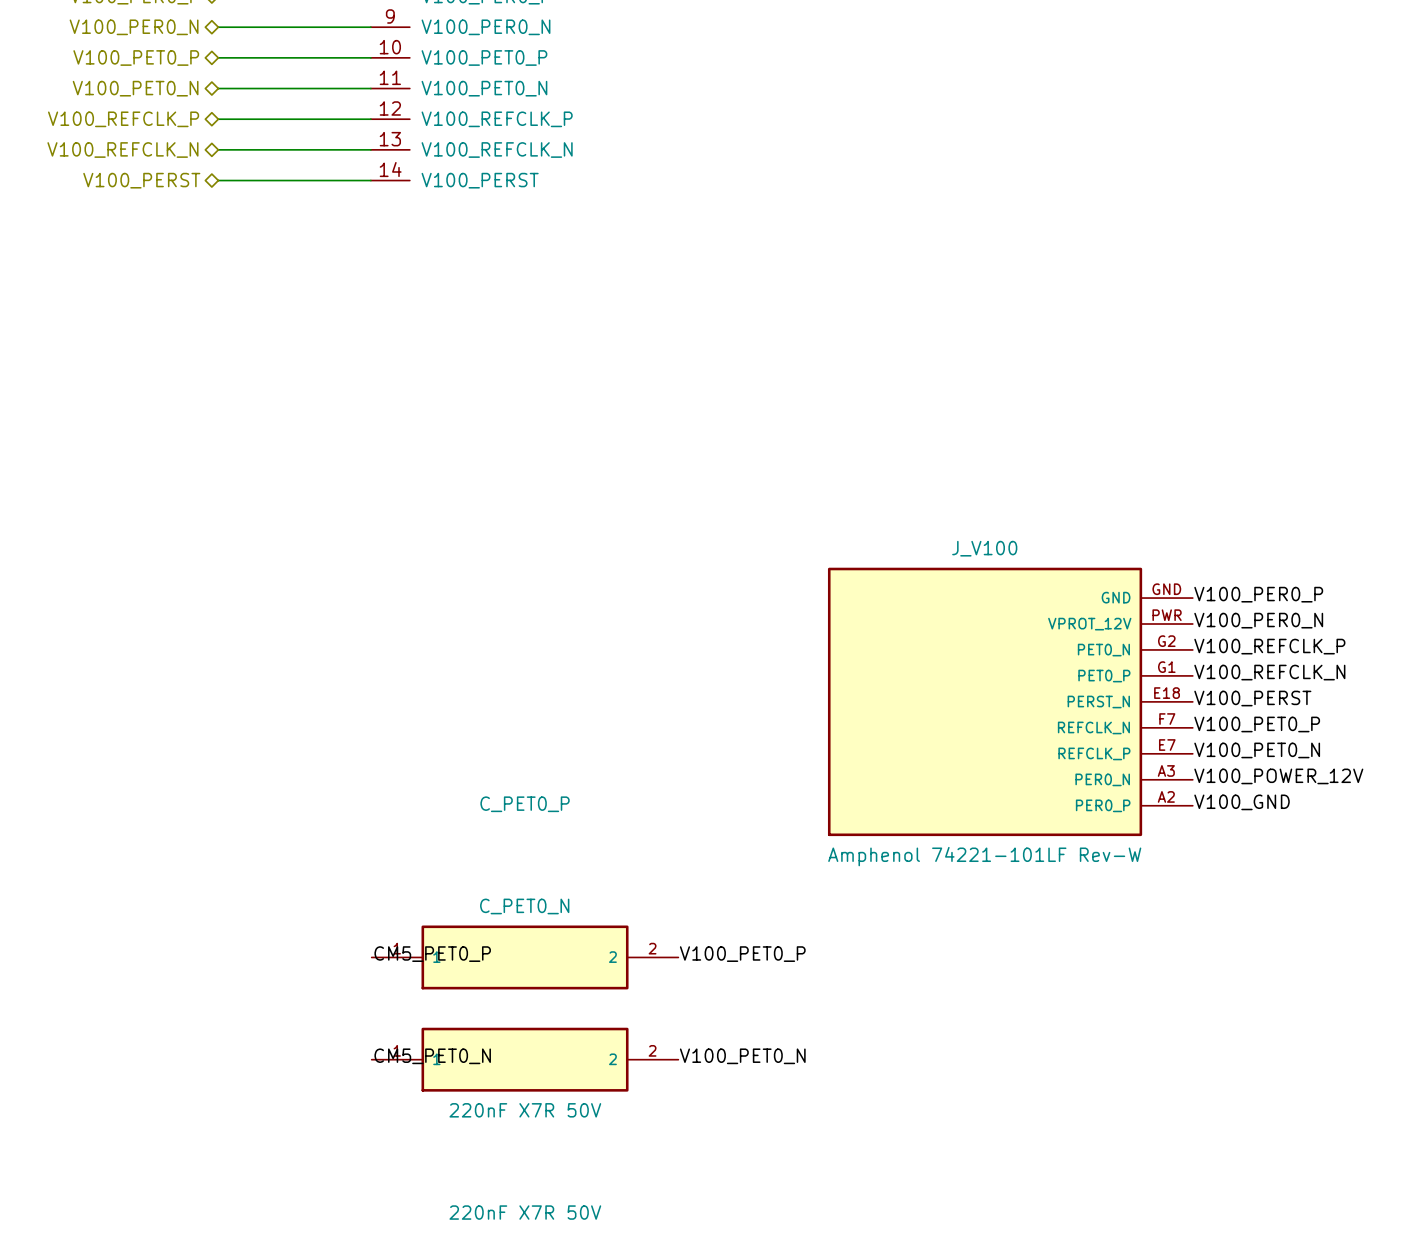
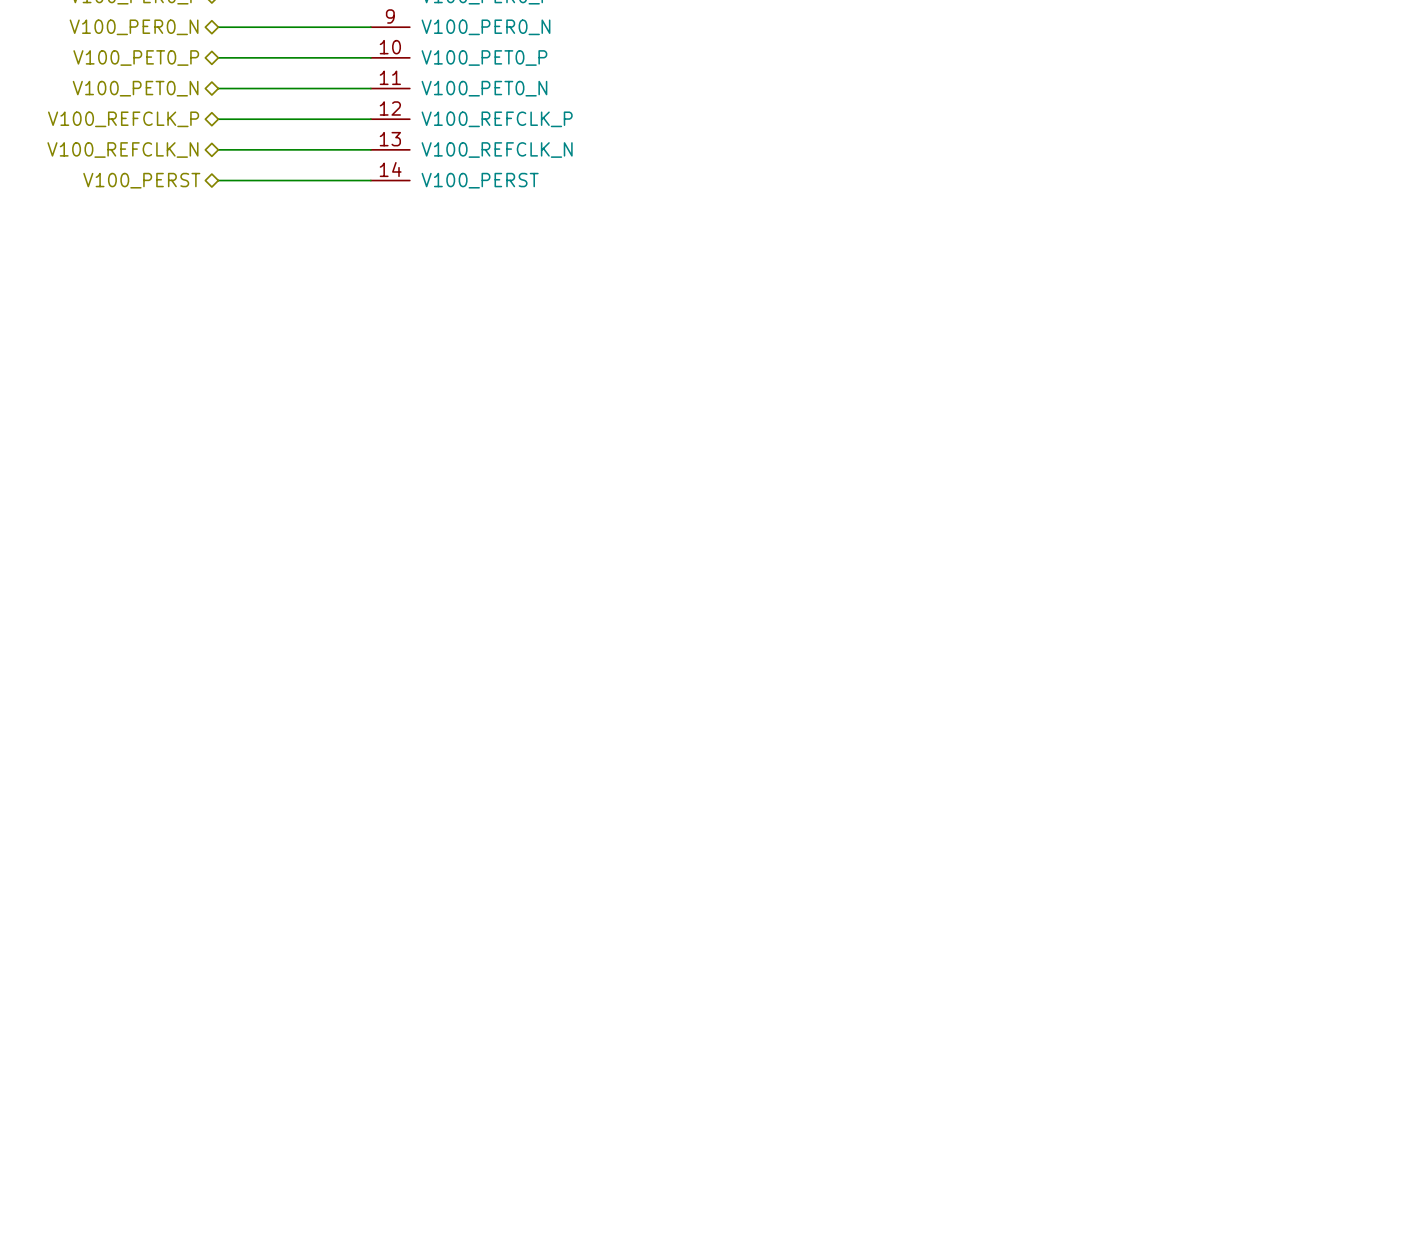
label: V100_PER0_P (1258, 594) -> none
label: V100_PER0_N (1258, 620) -> none
label: V100_REFCLK_P (1269, 646) -> none
label: V100_REFCLK_N (1269, 672) -> none
label: V100_PERST (1252, 698) -> none
J_V100: Amphenol 74221-101LF Rev-W (1010, 701) -> none
label: V100_PET0_P (1257, 724) -> none
label: V100_PET0_N (1257, 750) -> none
label: V100_POWER_12V (1278, 776) -> none
label: V100_GND (1242, 802) -> none
label: CM5_PET0_P (432, 954) -> none
label: V100_PET0_P (742, 954) -> none
C_PET0_P: 220nF X7R 50V (525, 957) -> none
label: CM5_PET0_N (432, 1056) -> none
label: V100_PET0_N (742, 1056) -> none
C_PET0_N: 220nF X7R 50V (525, 1059) -> none

